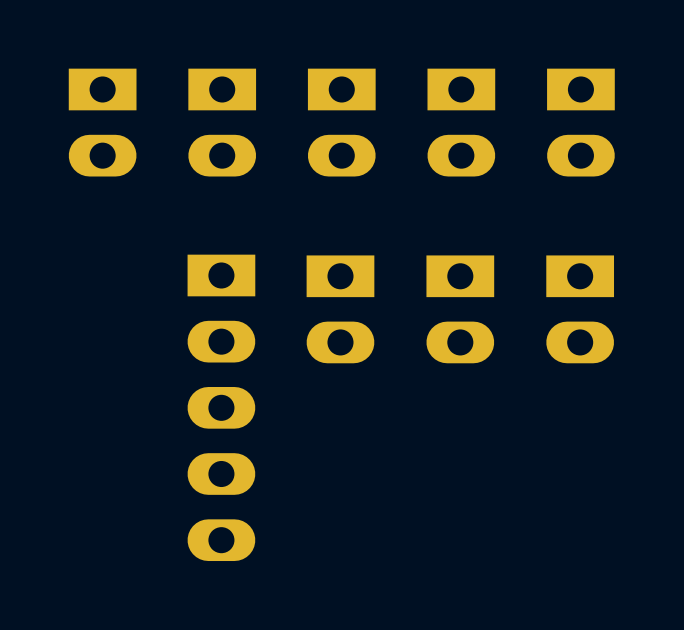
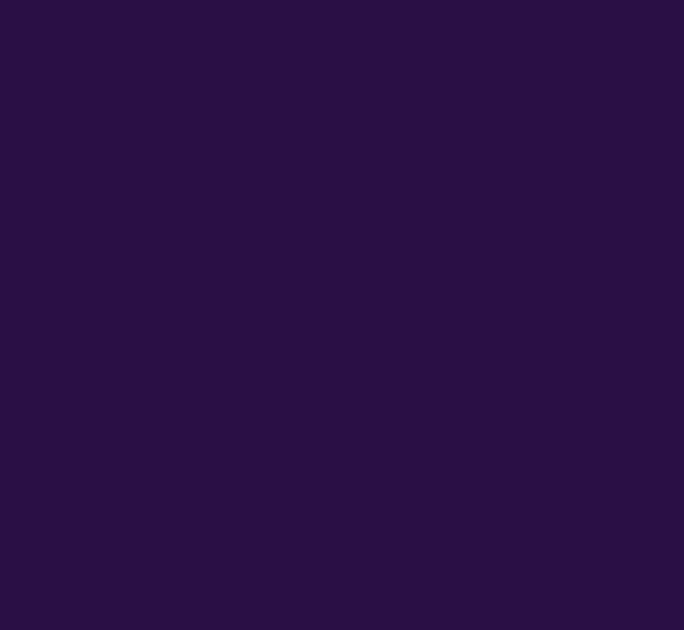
part: (102, 122) -> none
part: (222, 122) -> none
part: (341, 122) -> none
part: (461, 122) -> none
part: (580, 122) -> none
part: (340, 309) -> none
part: (460, 309) -> none
part: (580, 309) -> none
part: (221, 407) -> none

